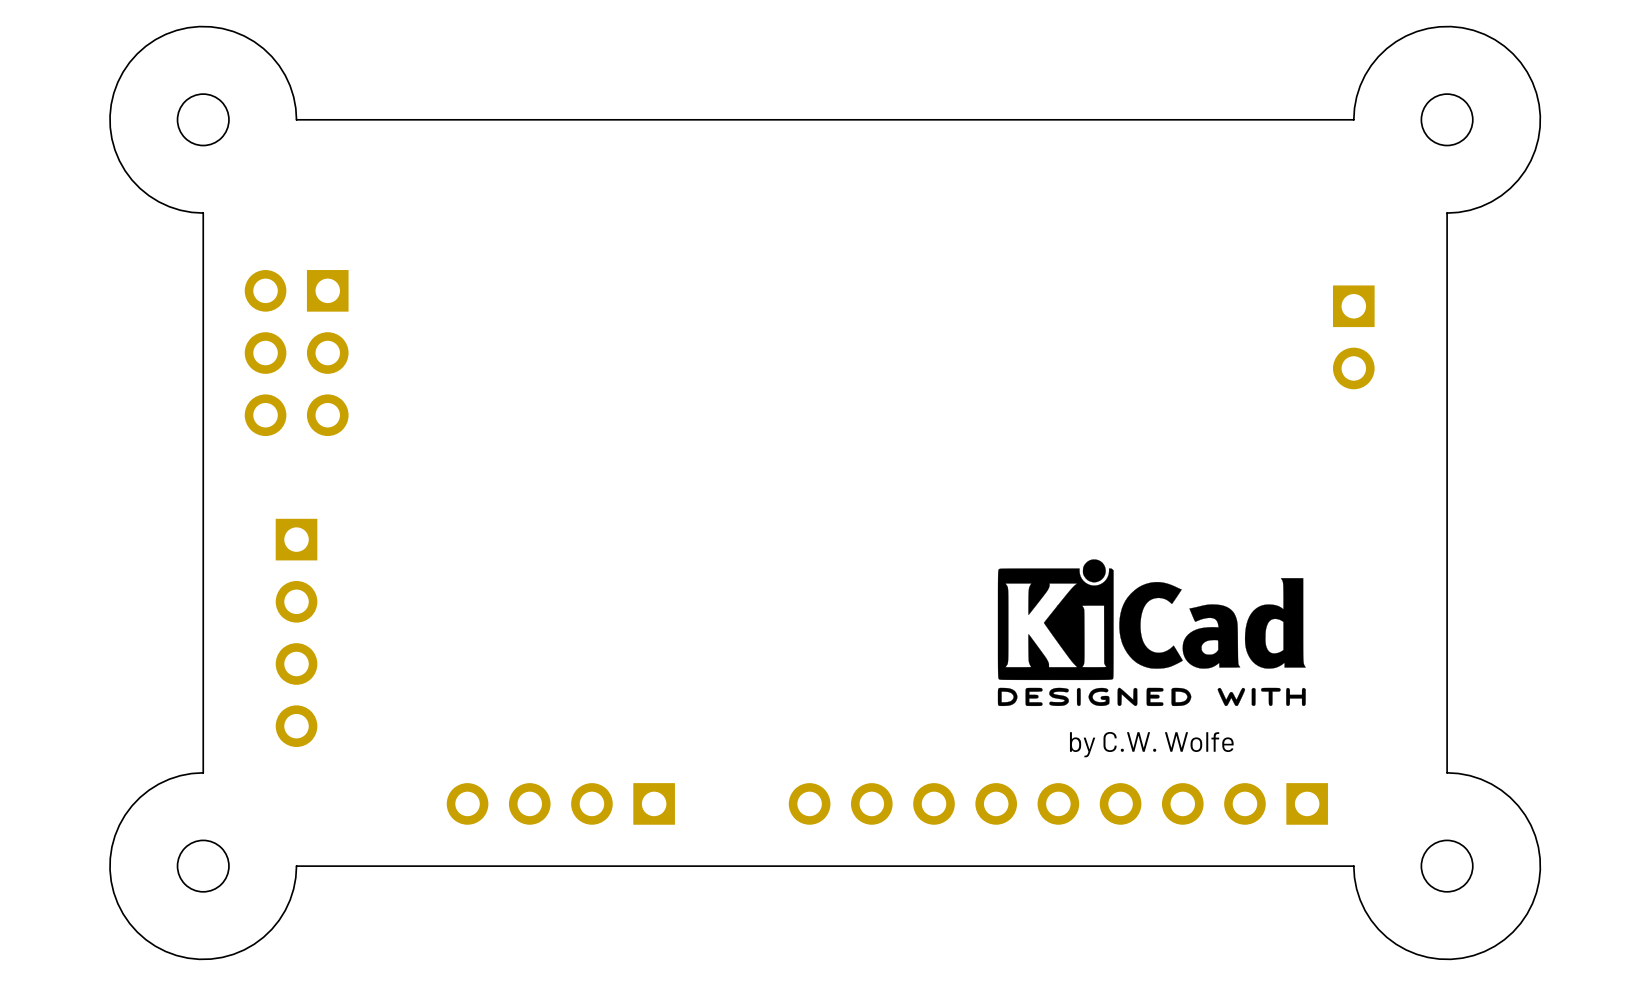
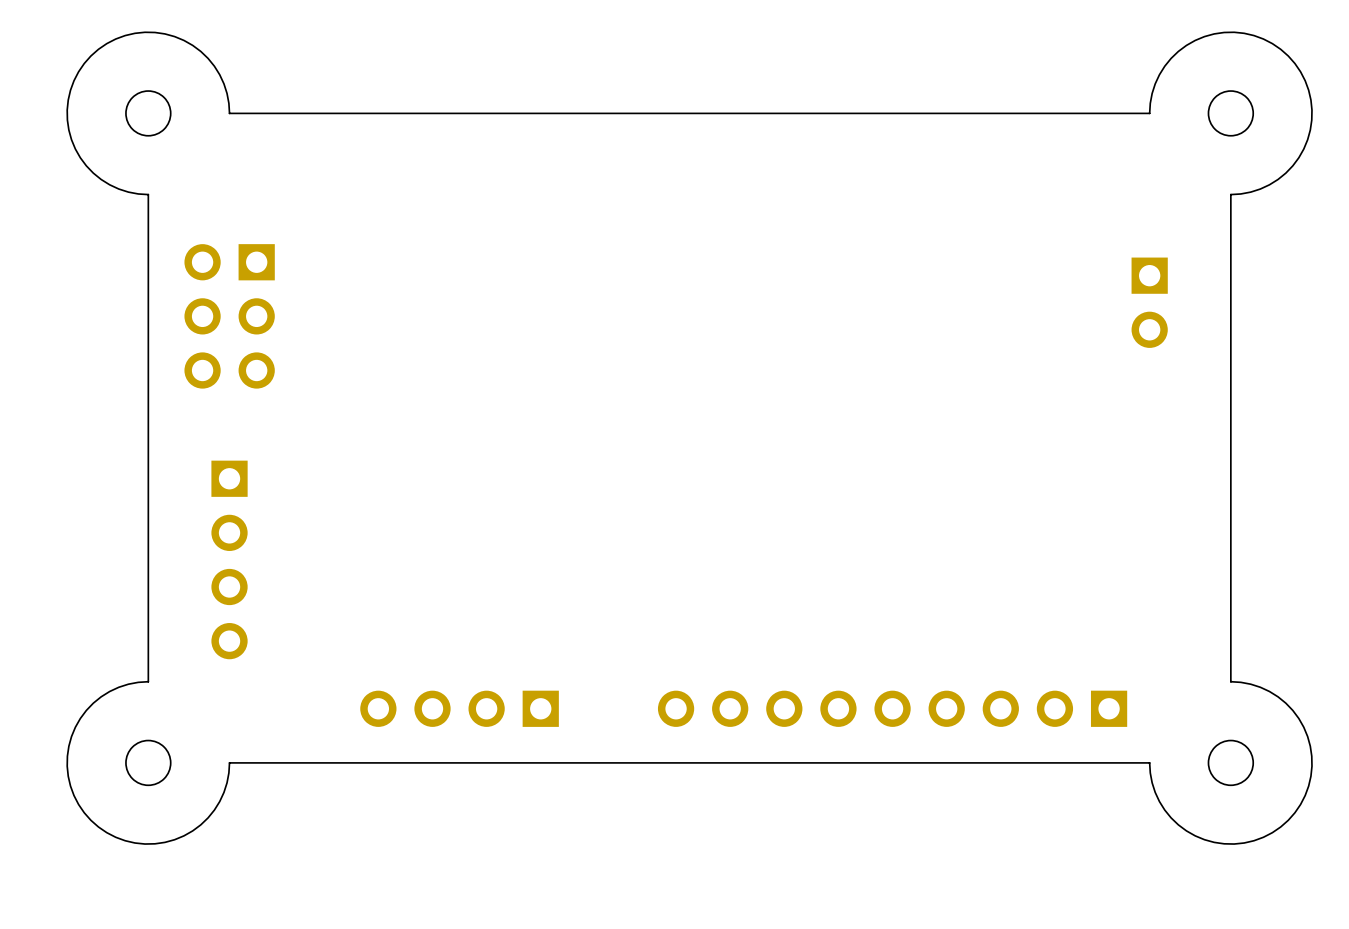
drawing: [997, 559, 1306, 707] -> none
text: by C.W. Wolfe (1151, 744) -> none

